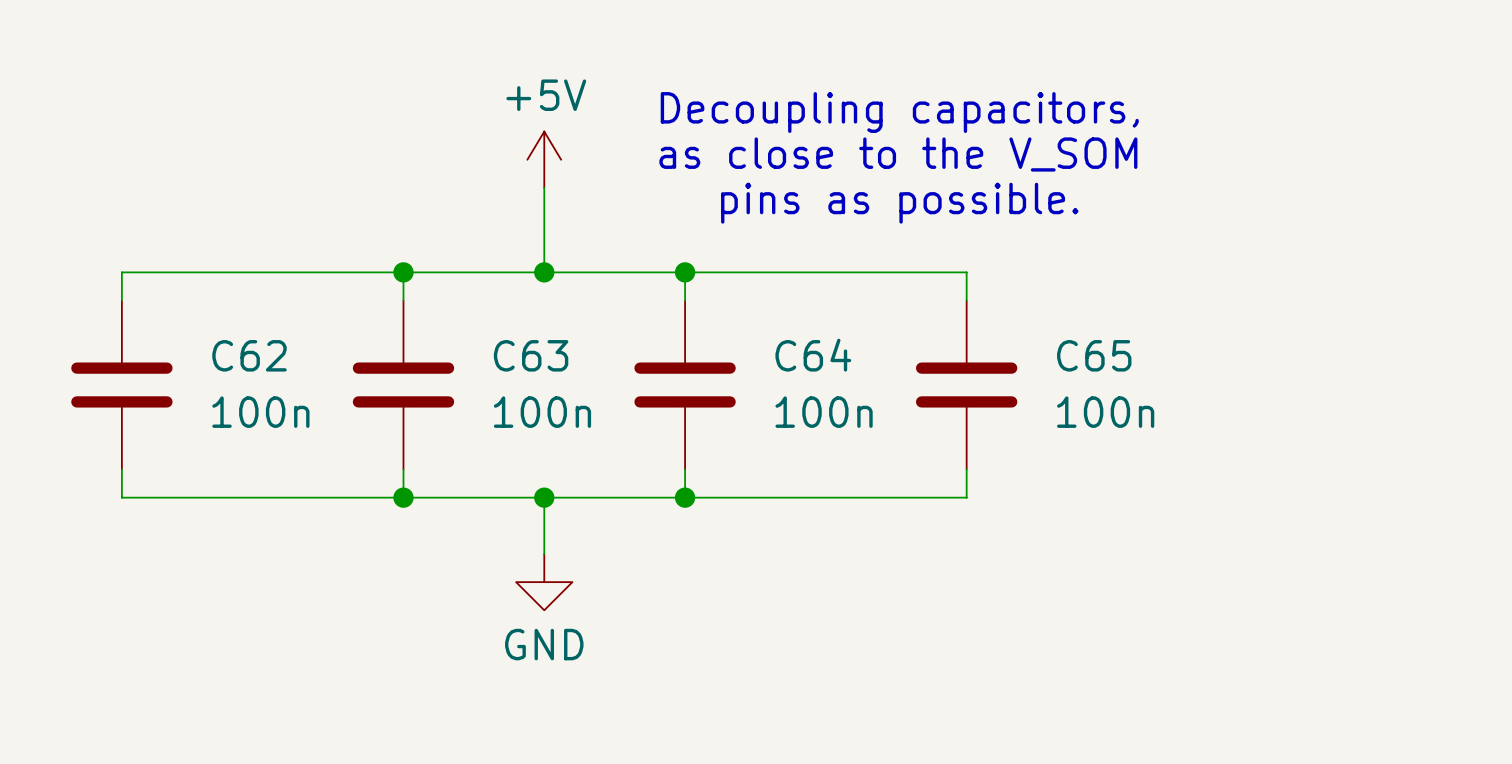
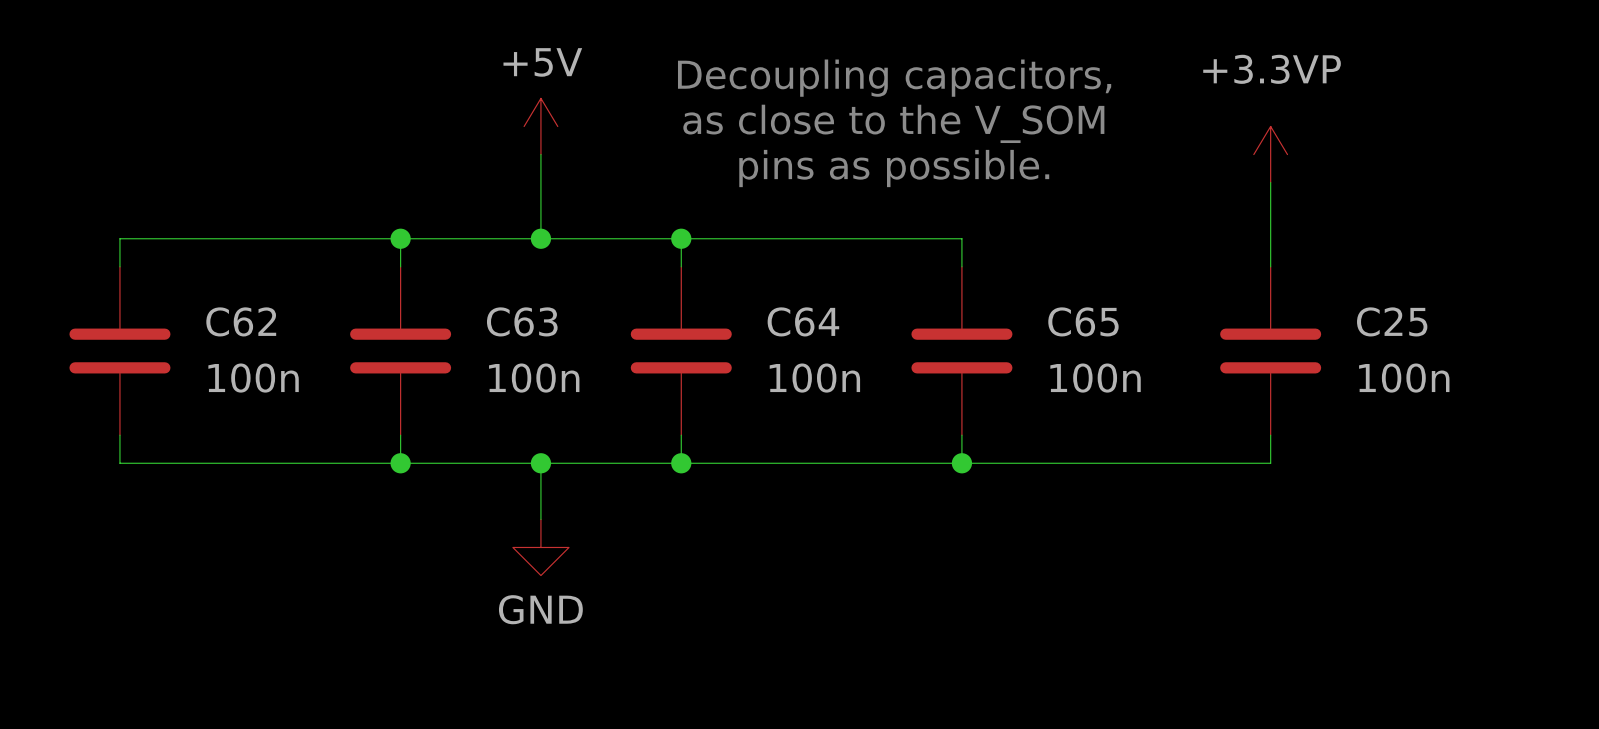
power symbol: none -> +3.3VP (1270, 154)
wire: none -> (1270, 182) (1270, 266)
C25: none -> 100n (1270, 351)
wire: none -> (1270, 435) (1270, 463) (961, 463)
junction: none -> (961, 463)

